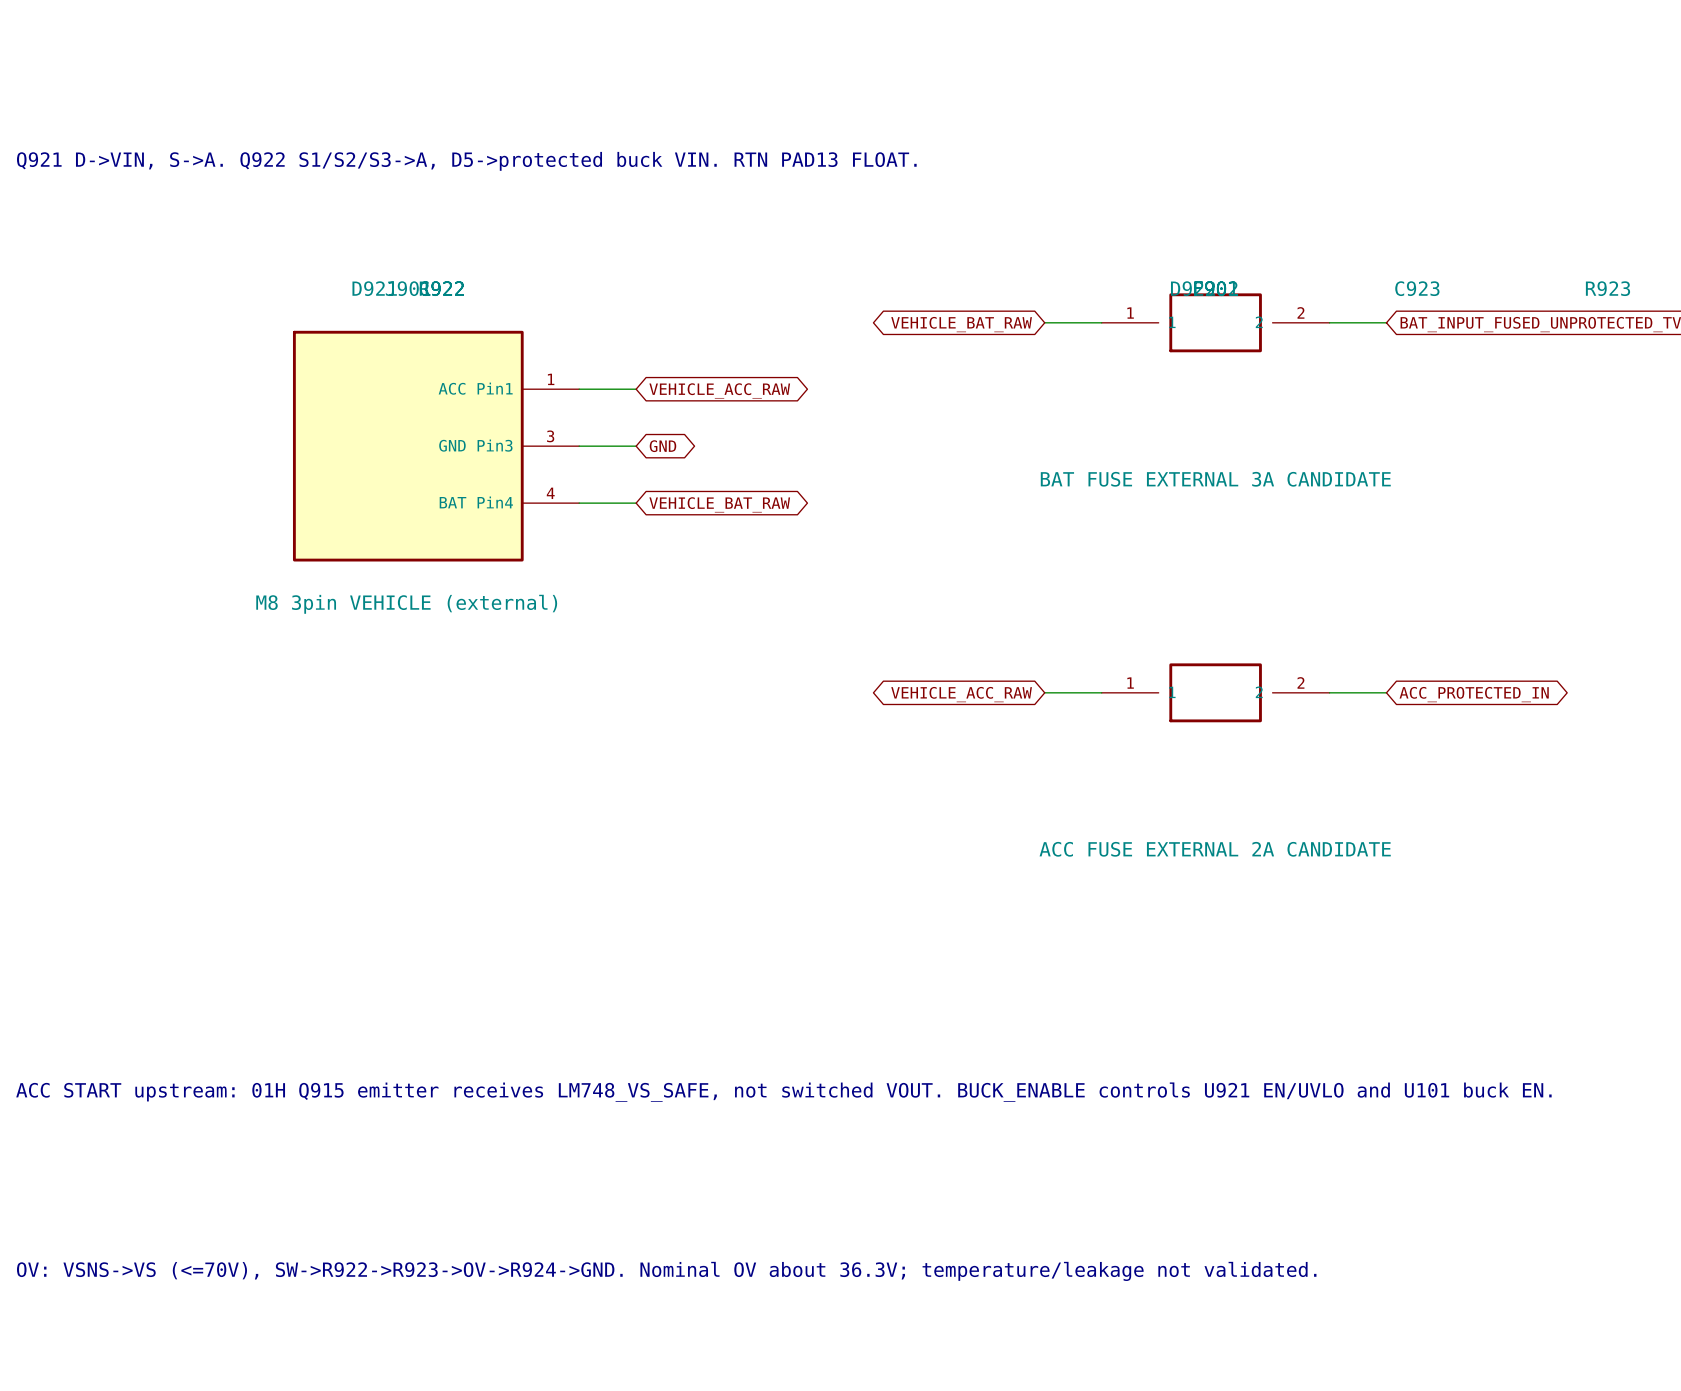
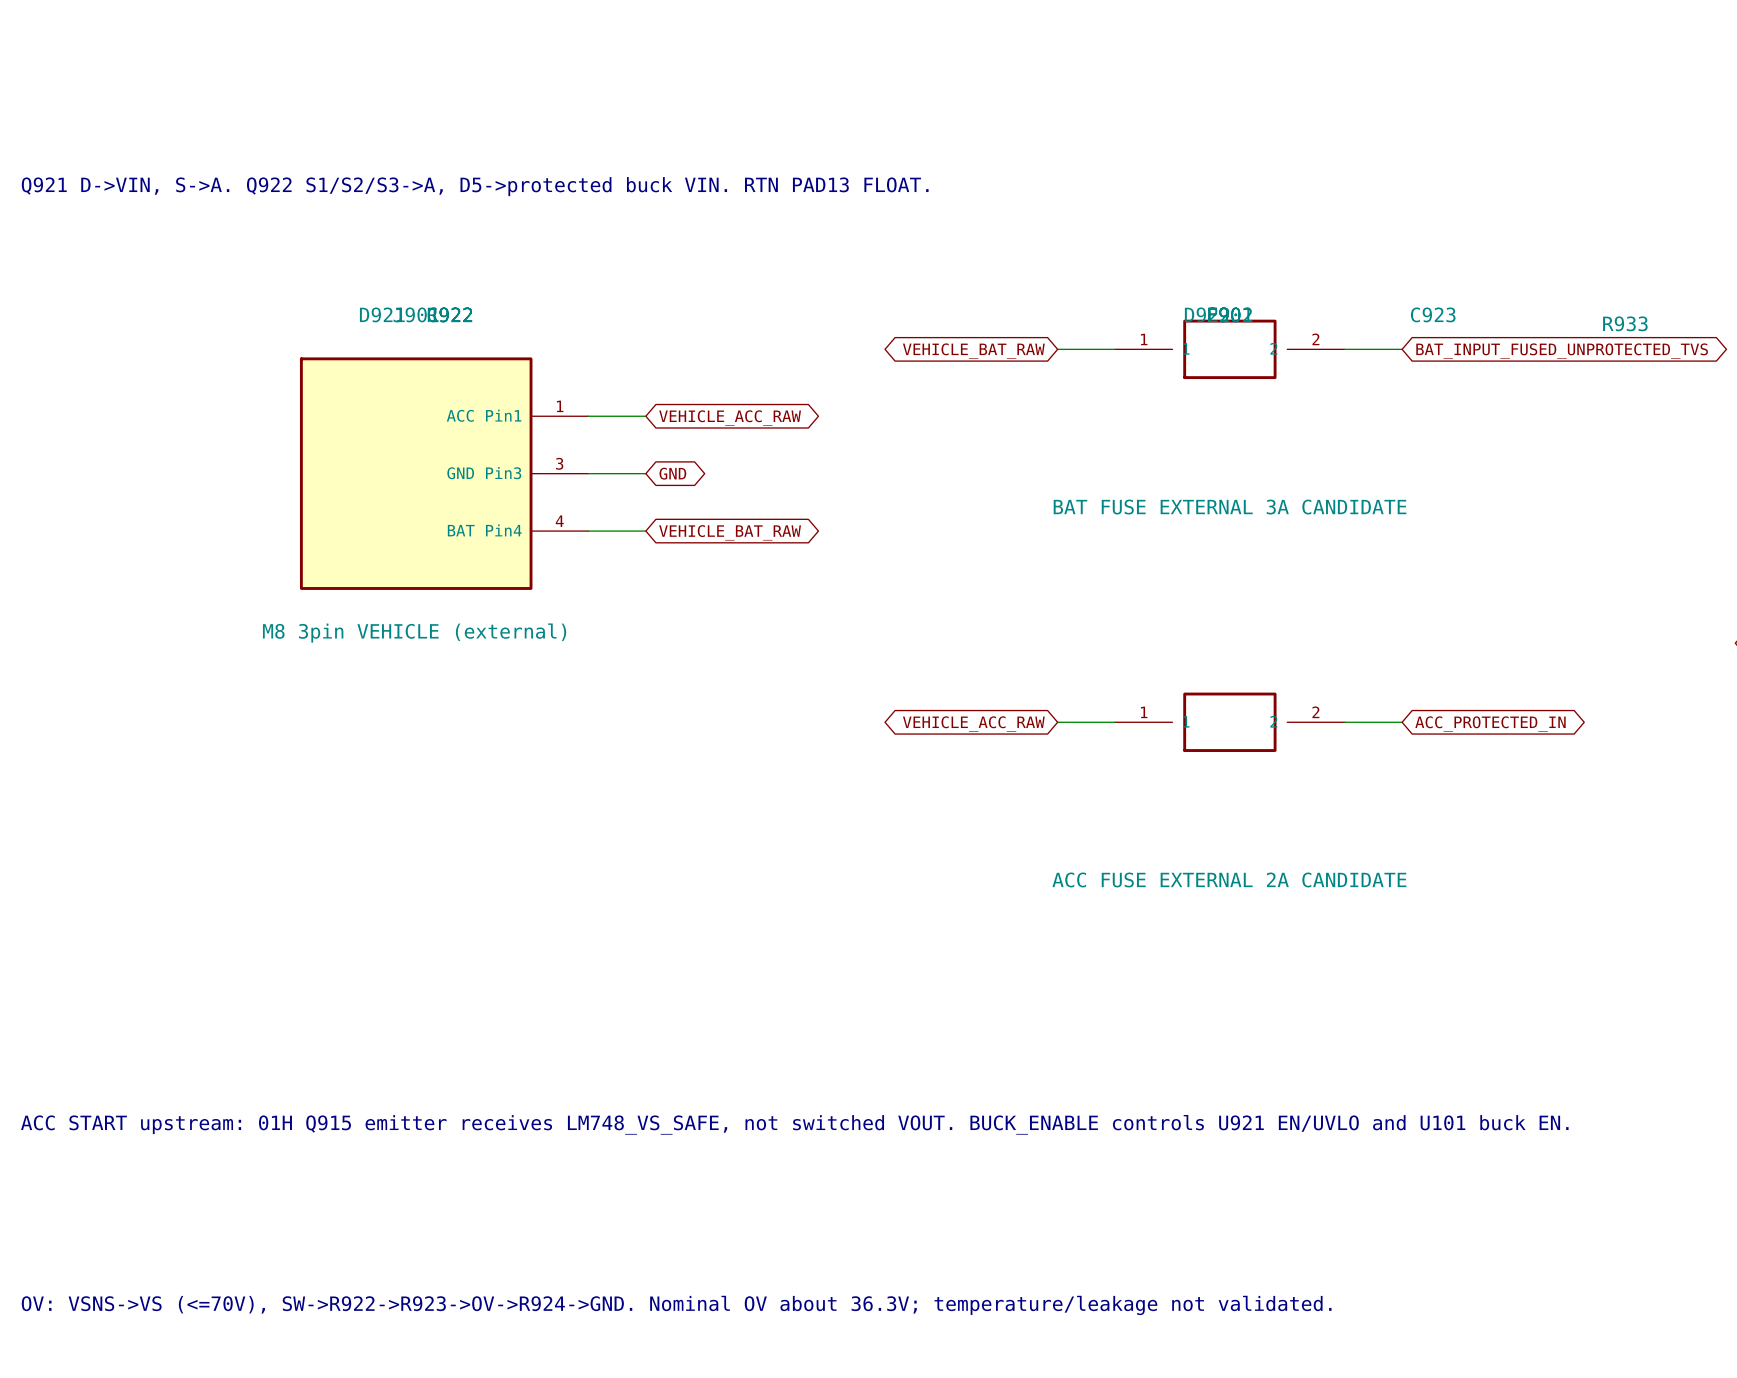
R923 name: R923 (1608, 288) -> R933 (1625, 323)

